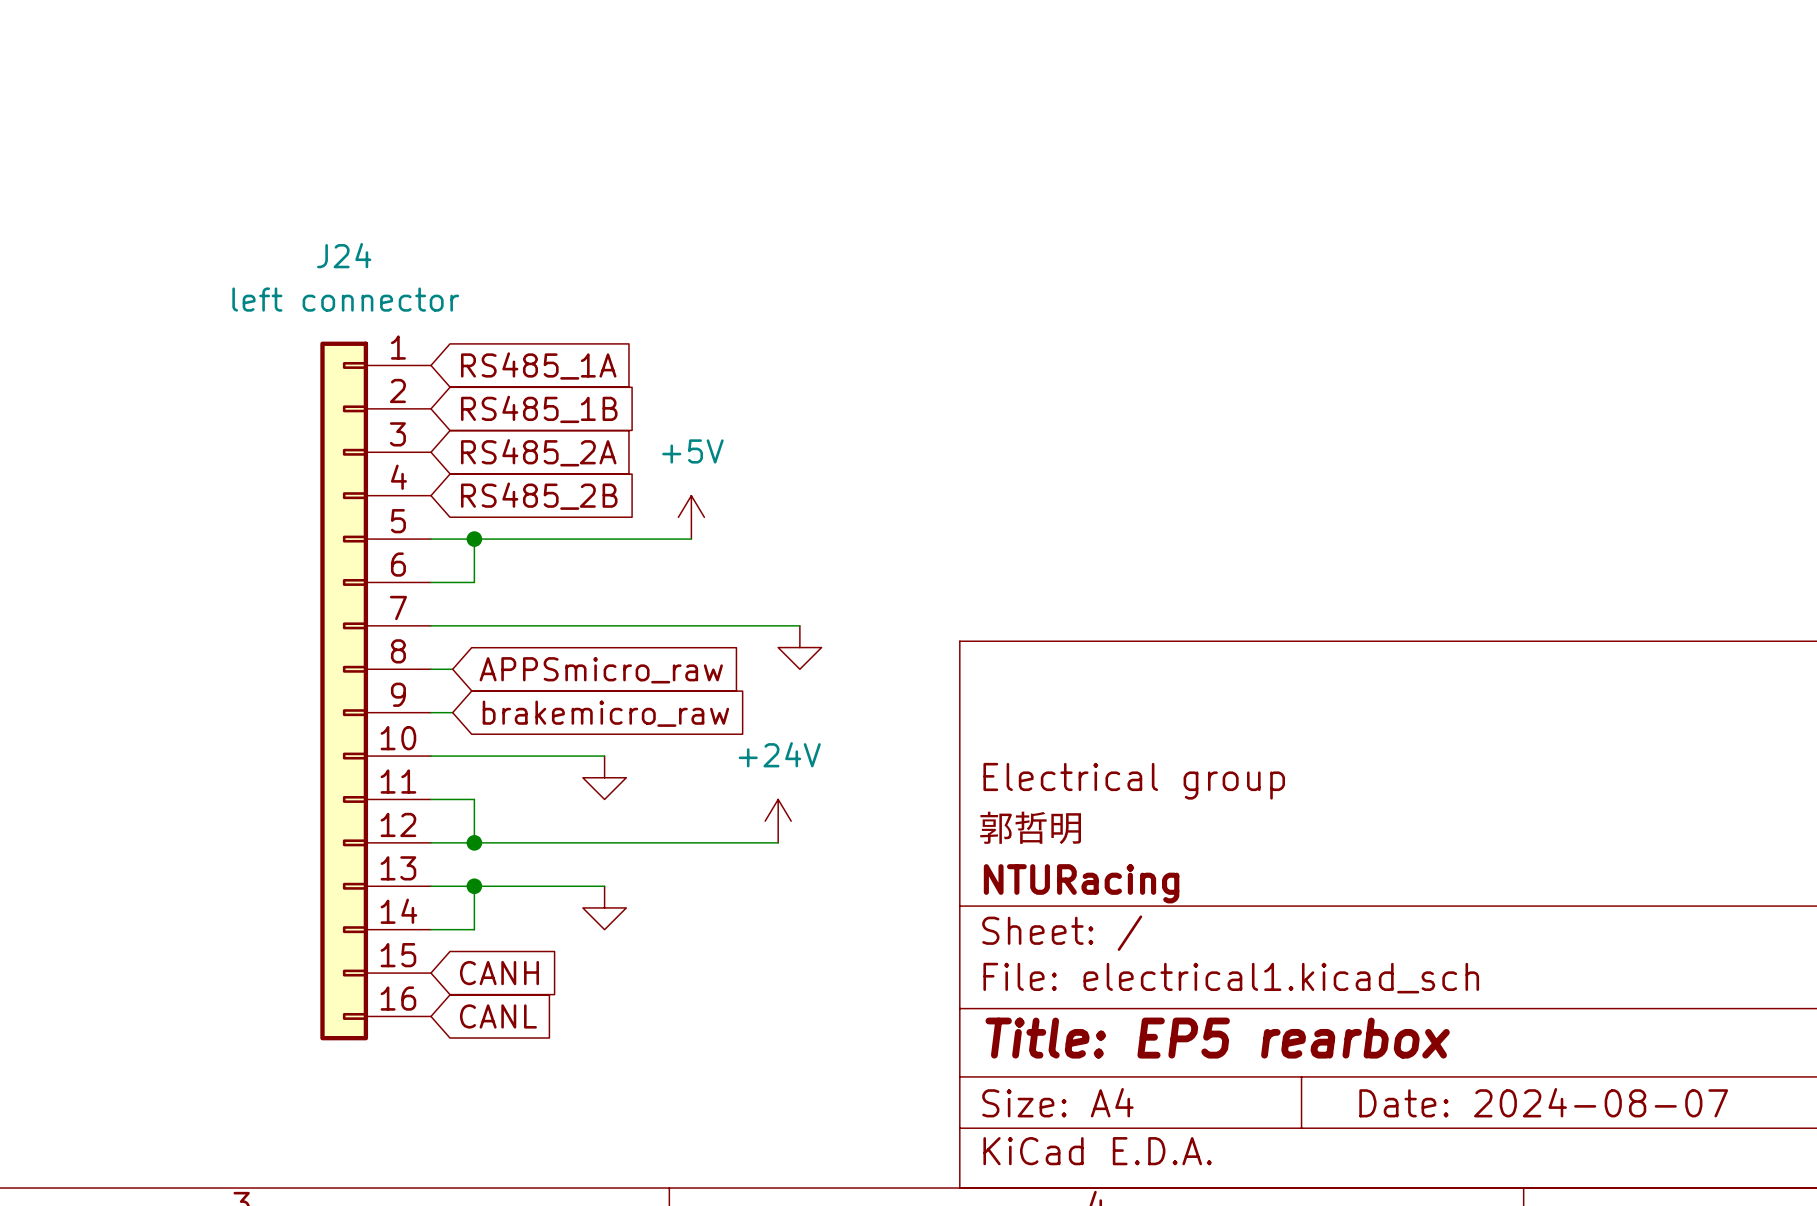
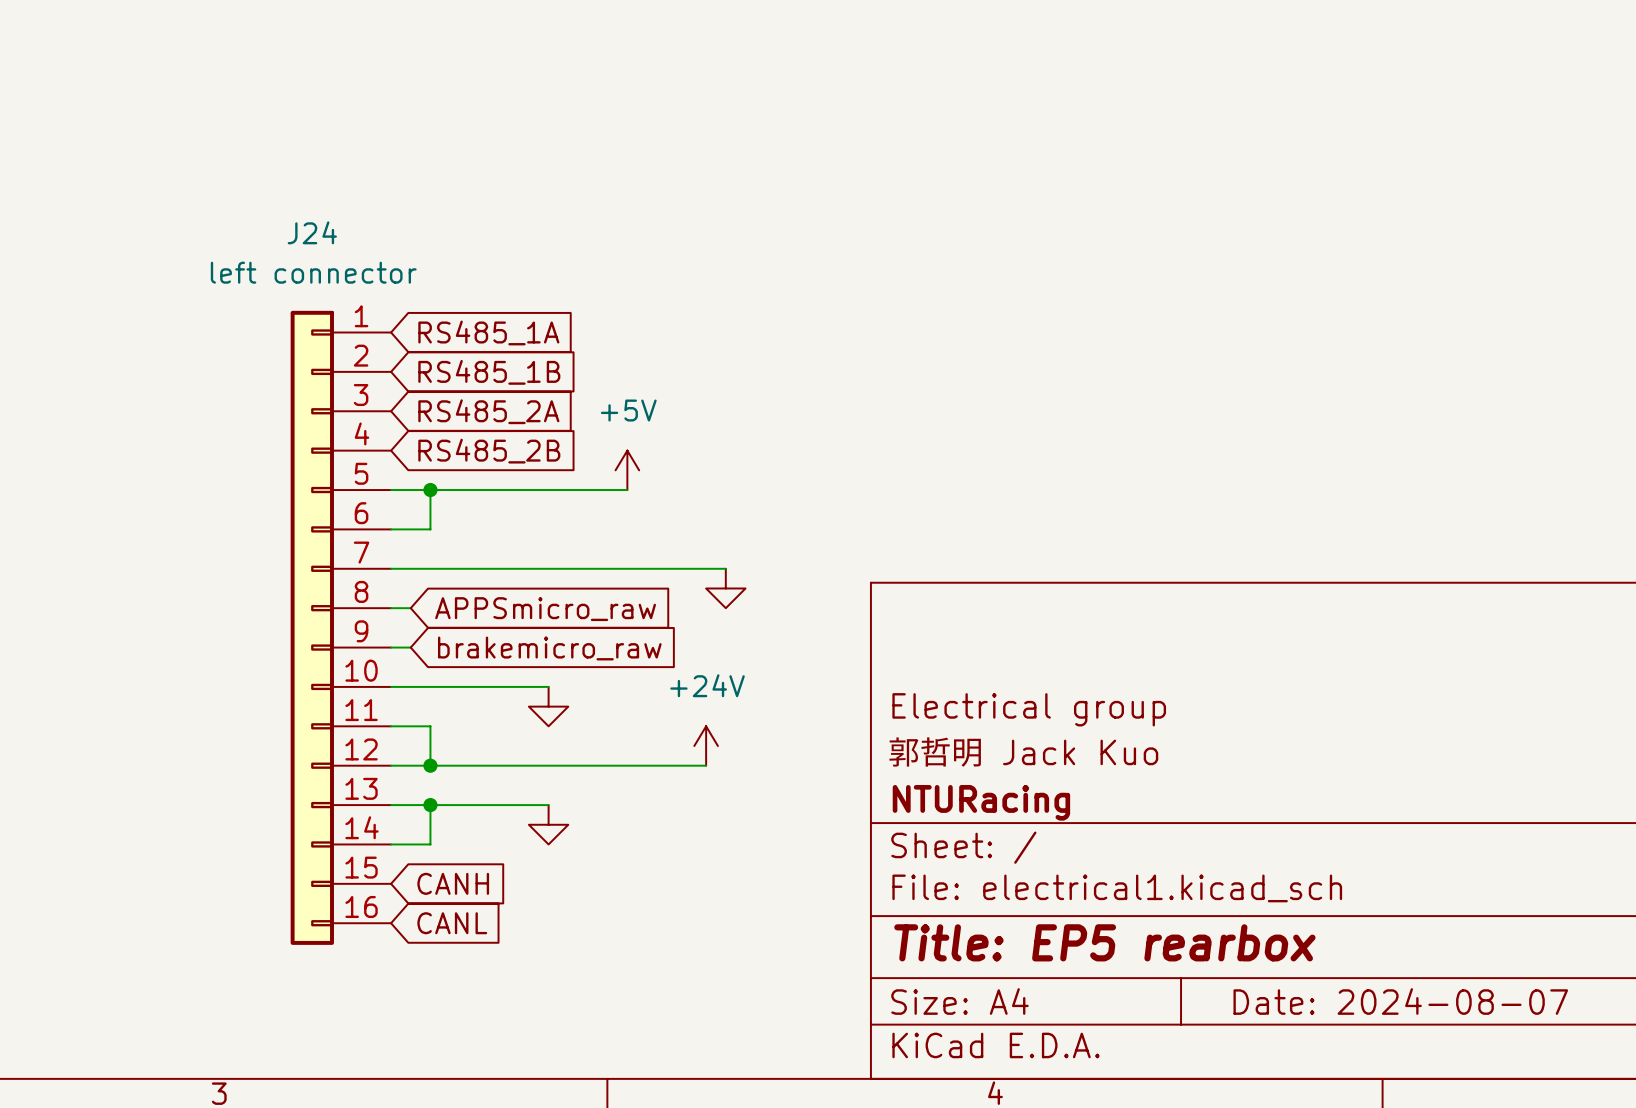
title block: 郭哲明 (1030, 827) -> 郭哲明 Jack Kuo (1023, 752)

